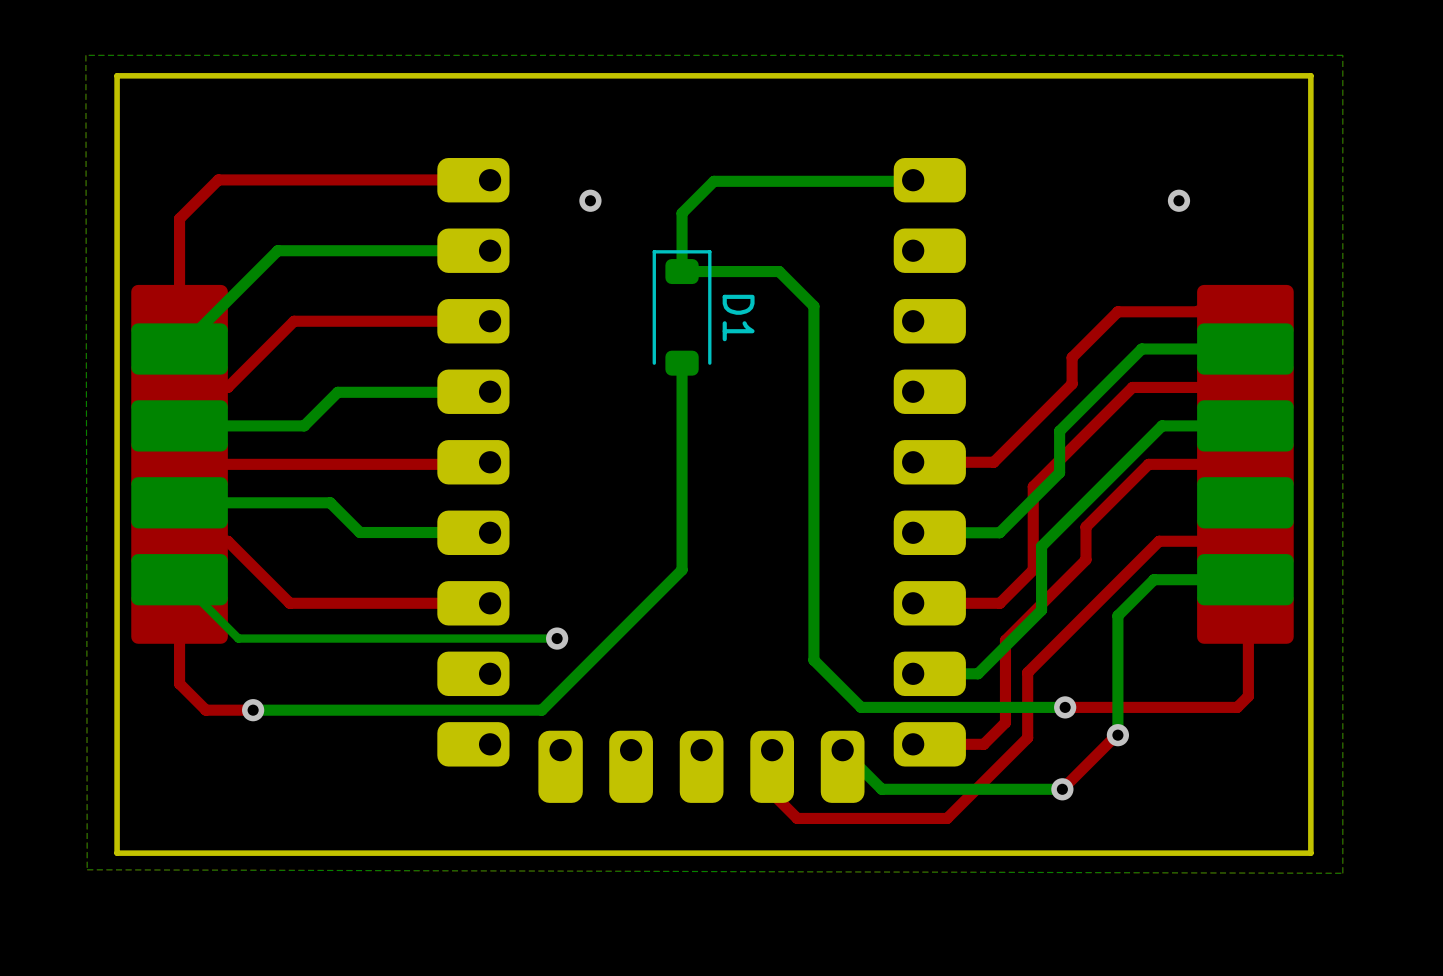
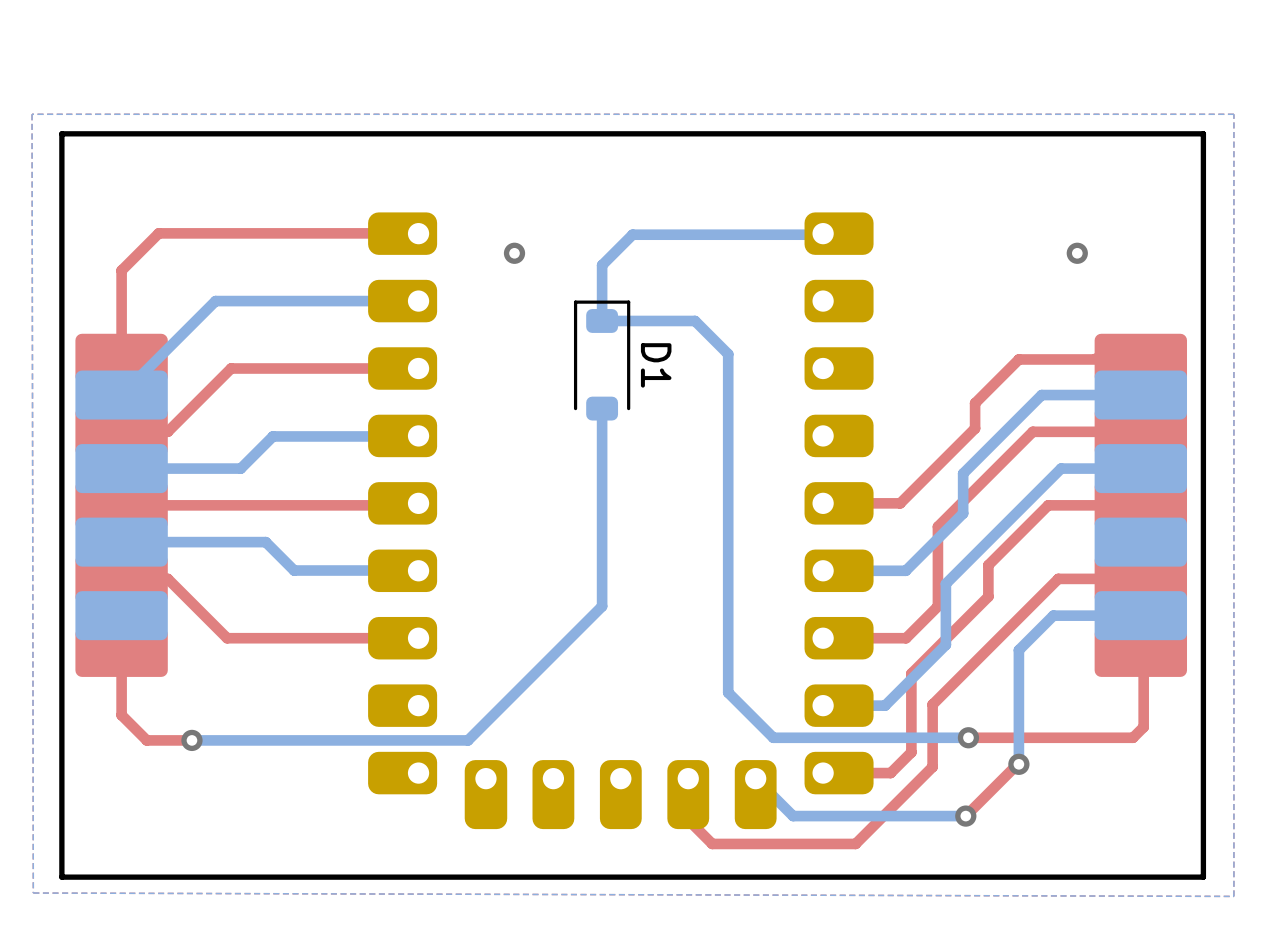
bottom track: (179, 579) (238, 638) (557, 638) -> none
via: (557, 638) -> none

